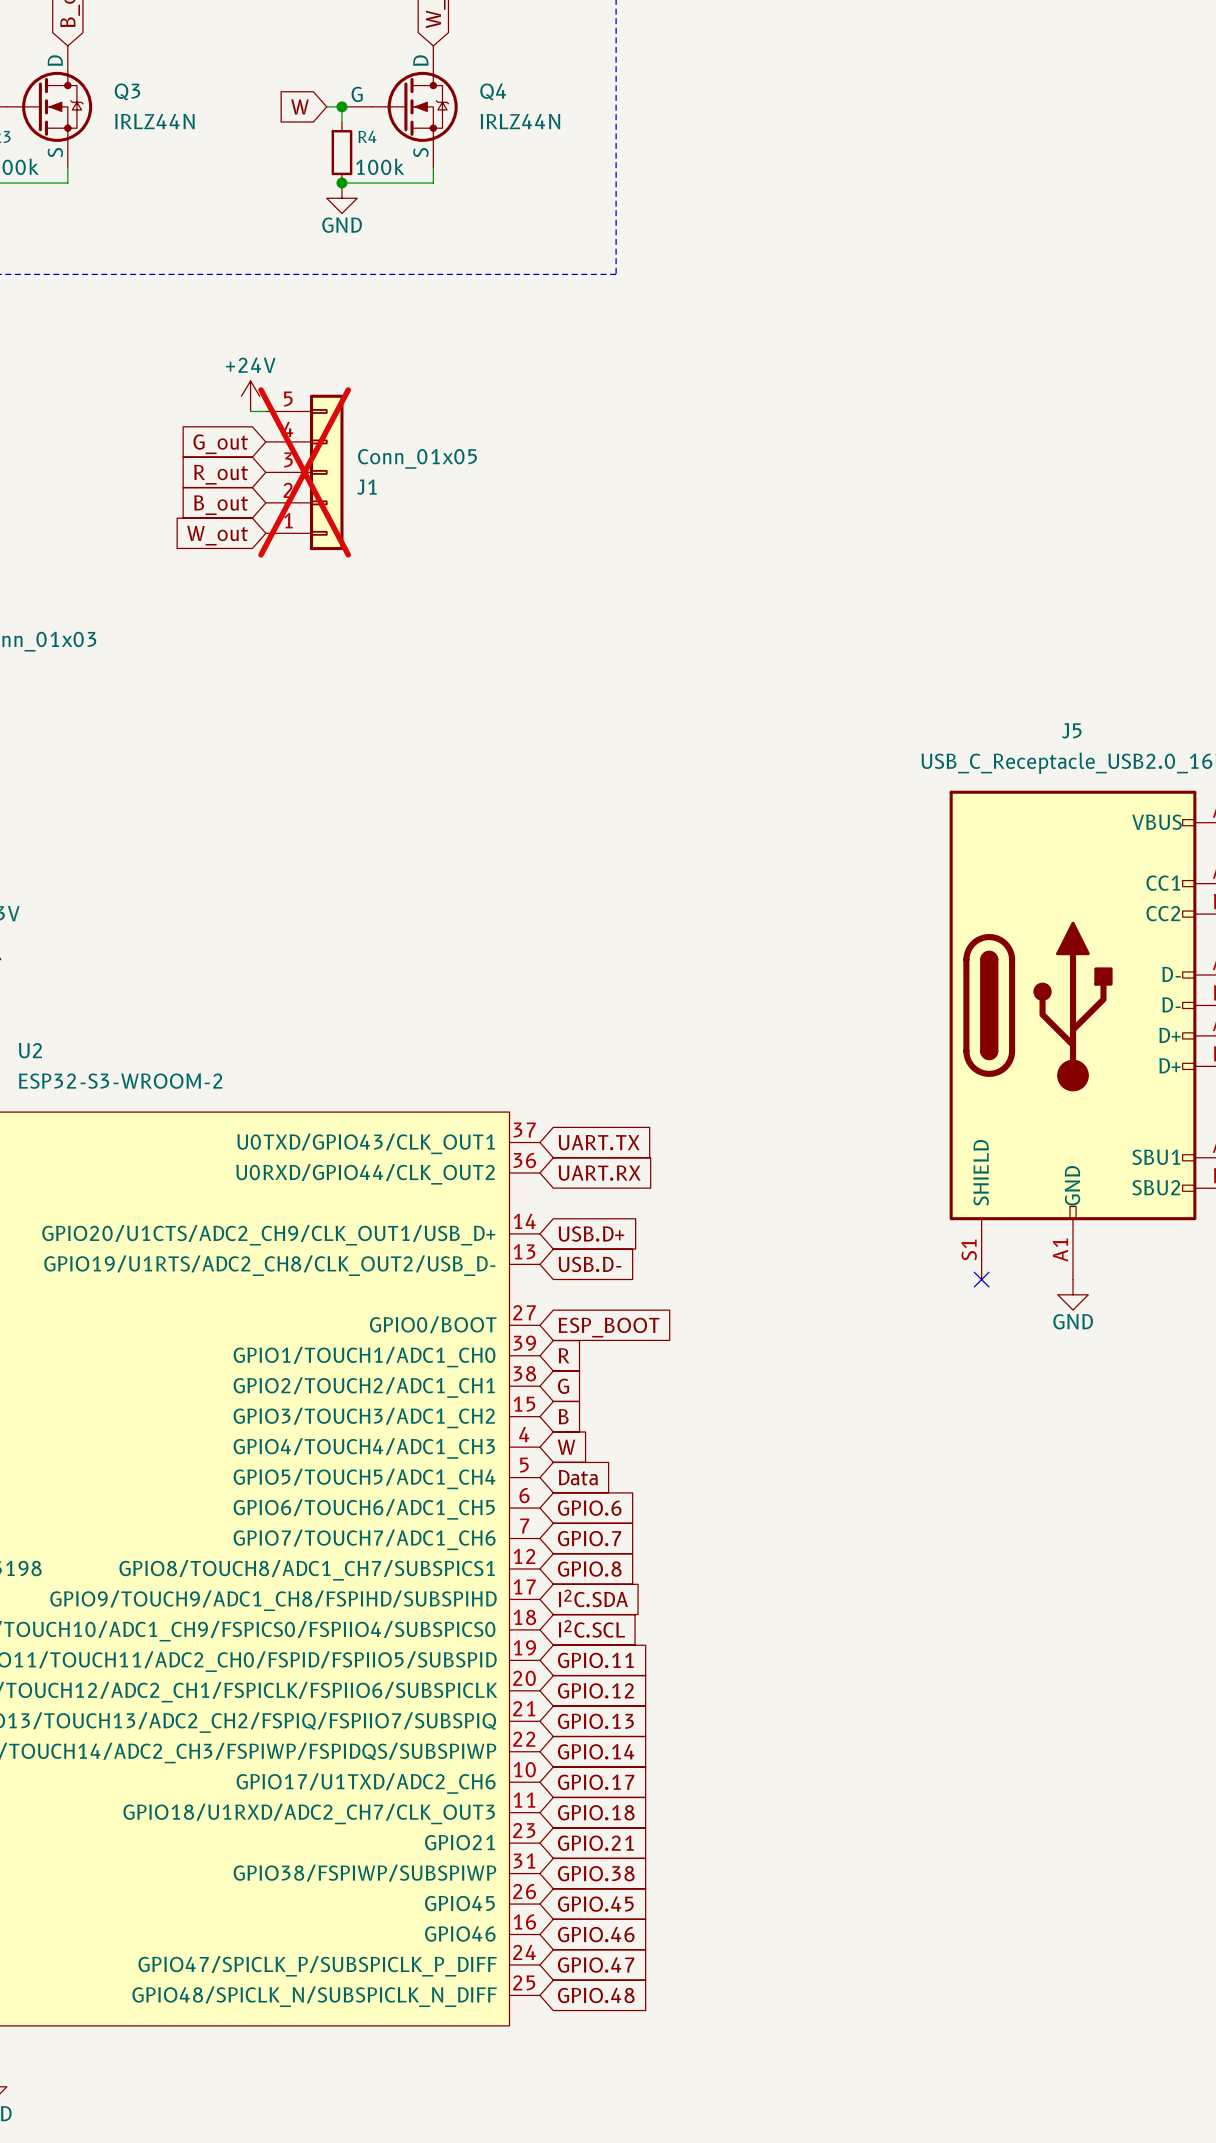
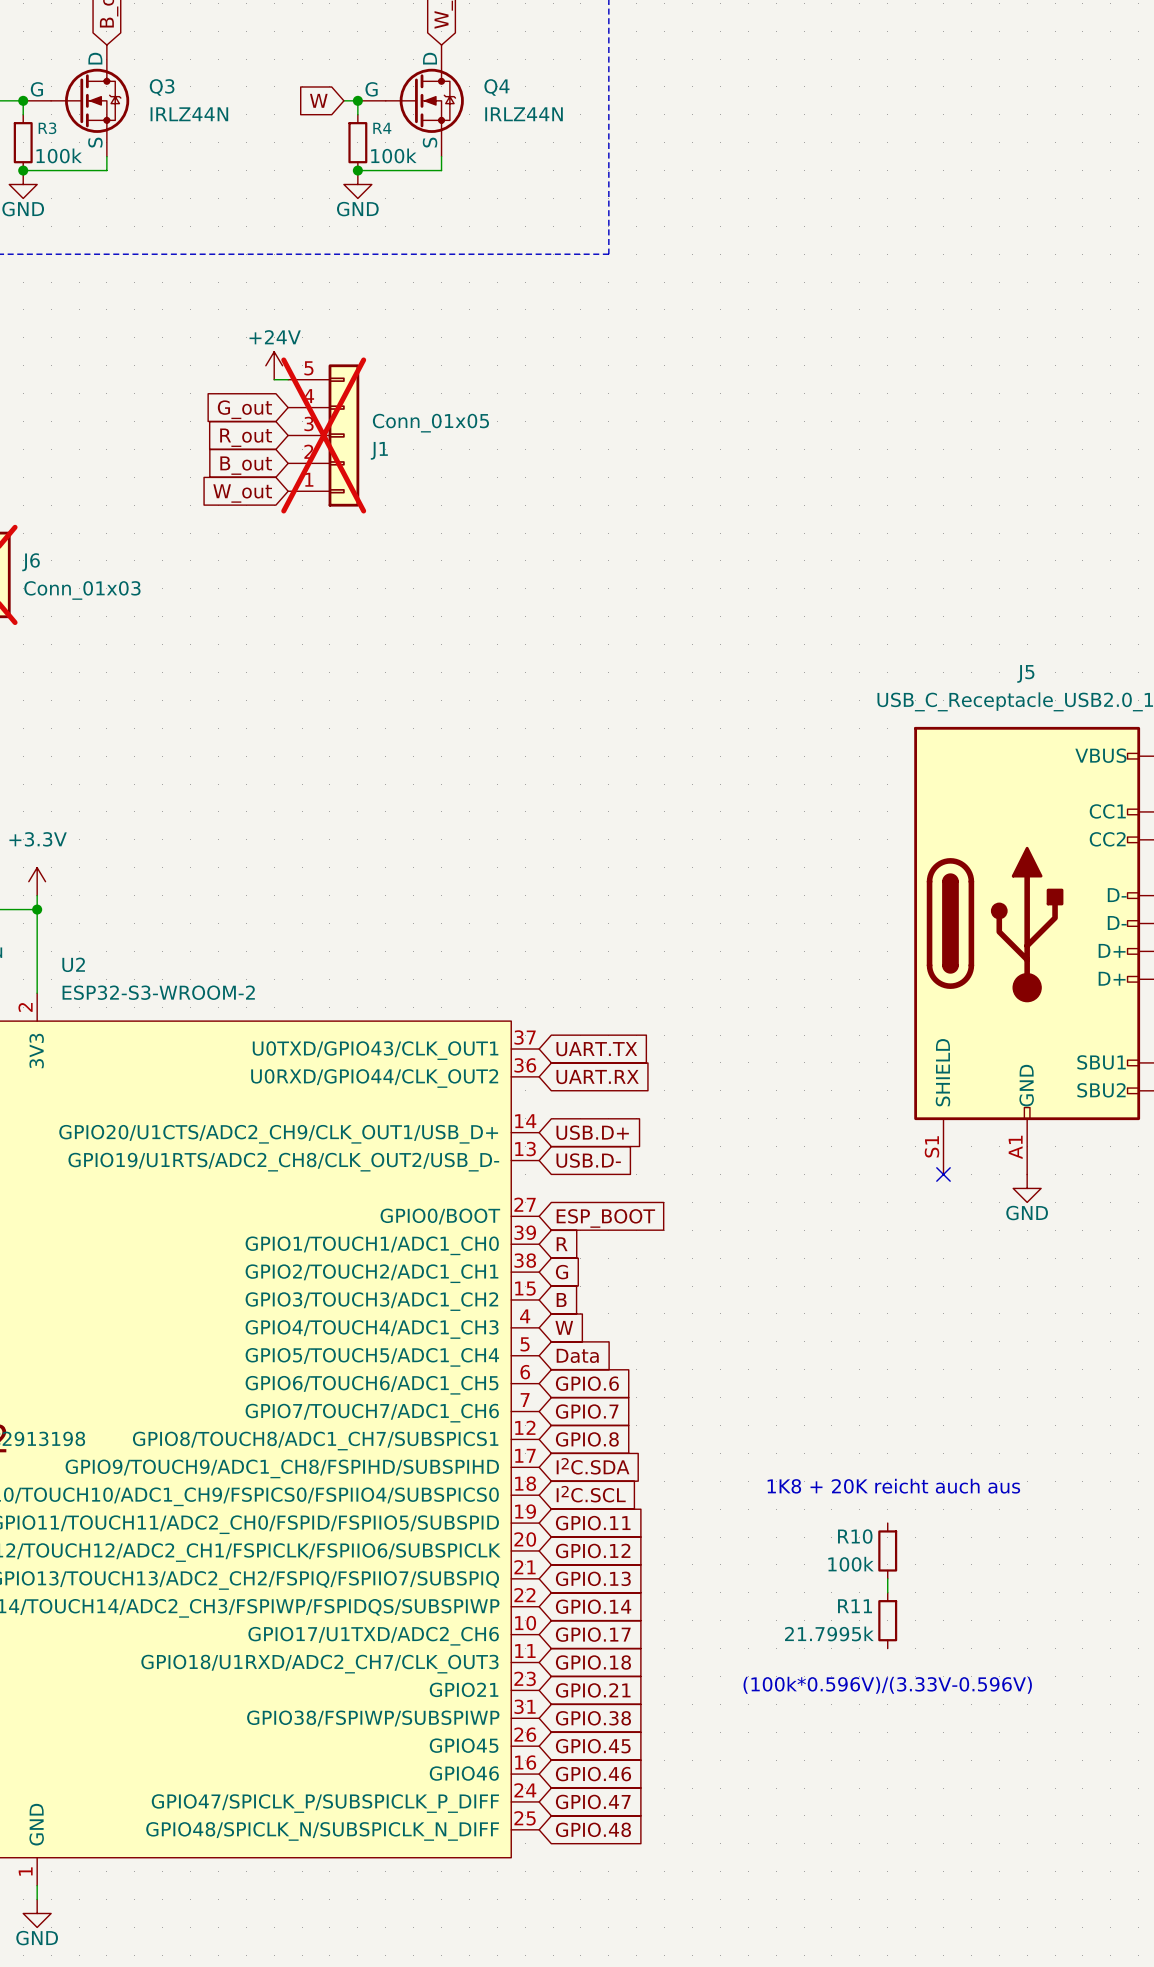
text: none -> 1K8 + 20K reicht auch aus (893, 1486)
R10: none -> 100k (887, 1550)
wire: none -> (887, 1578) (887, 1592)
R11: none -> 21.7995k (887, 1620)
text: none -> (100k*0.596V)/(3.33V-0.596V) (887, 1685)

